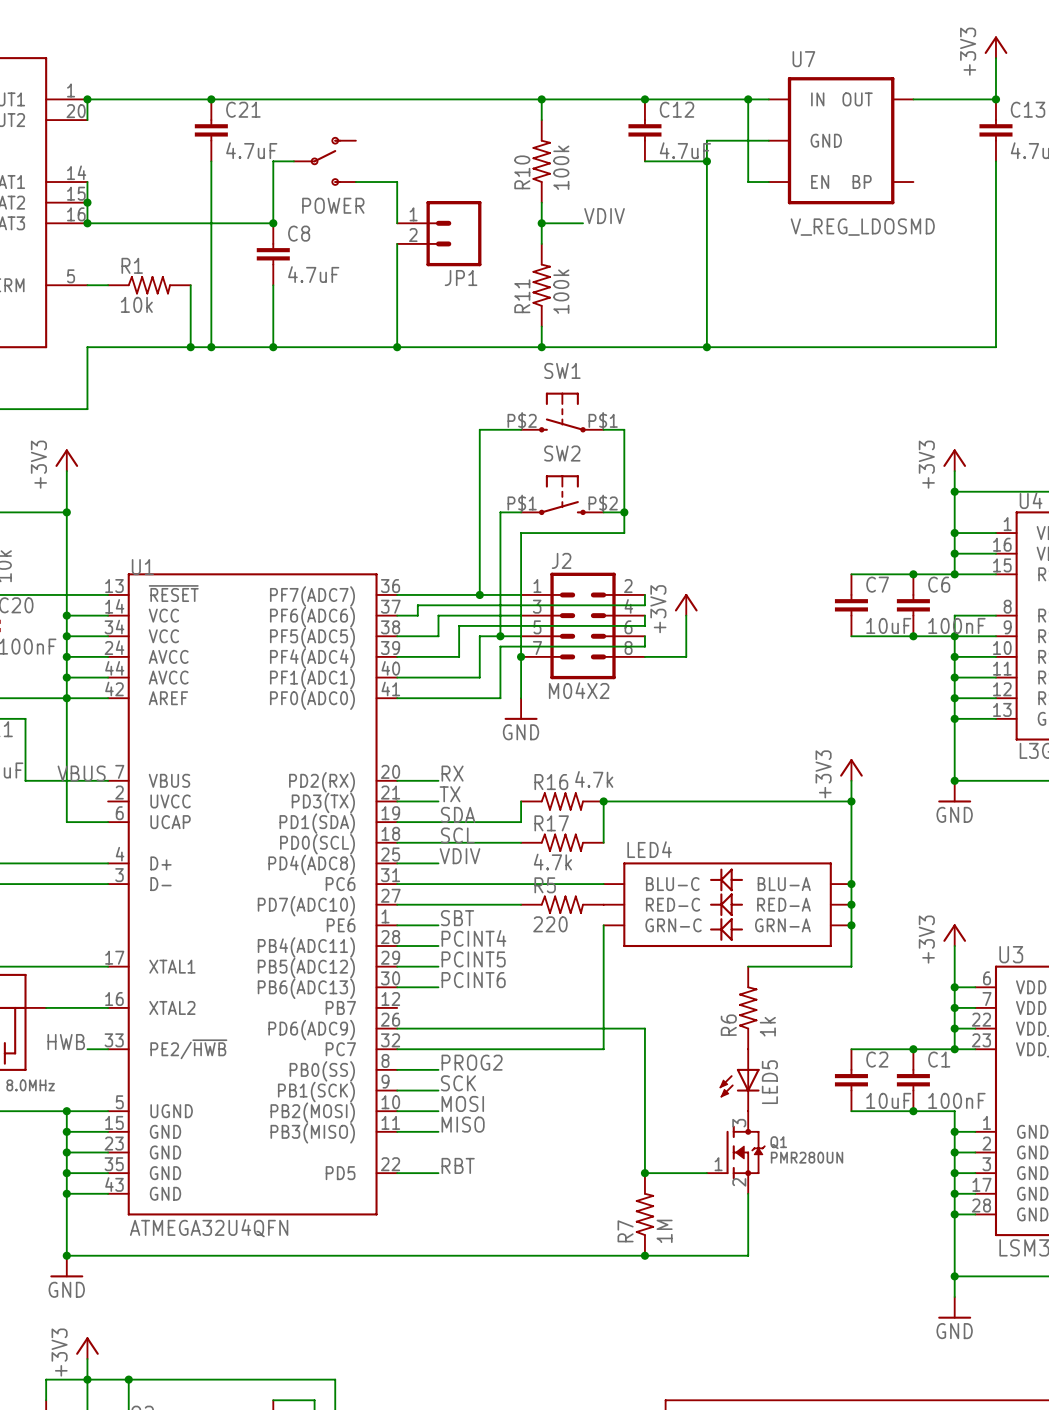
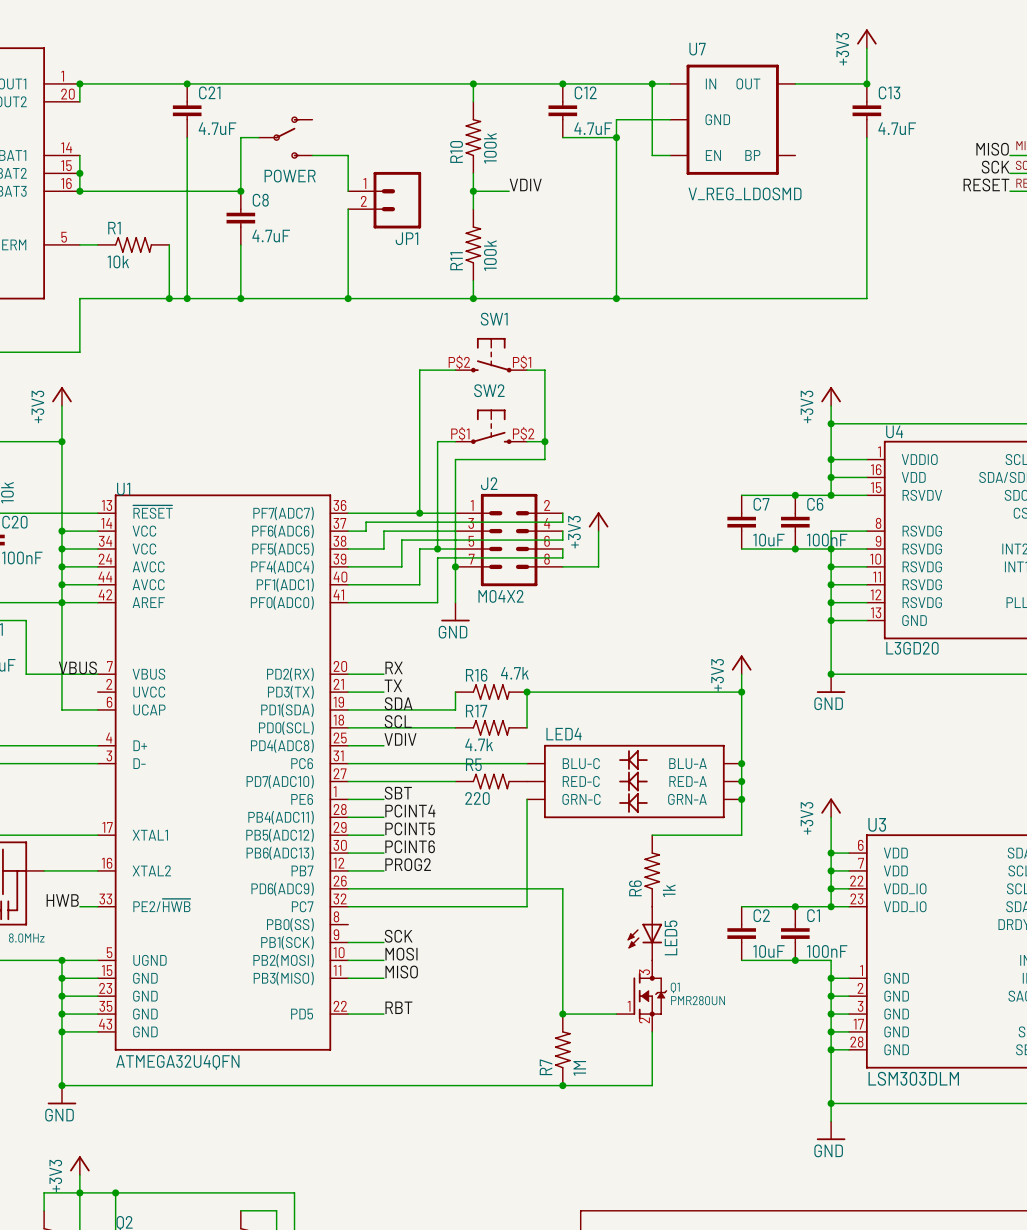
label position: PROG2 (472, 1062) -> PROG2 (408, 864)
wire: (397, 1069) (438, 1069) -> (348, 870) (383, 870)

